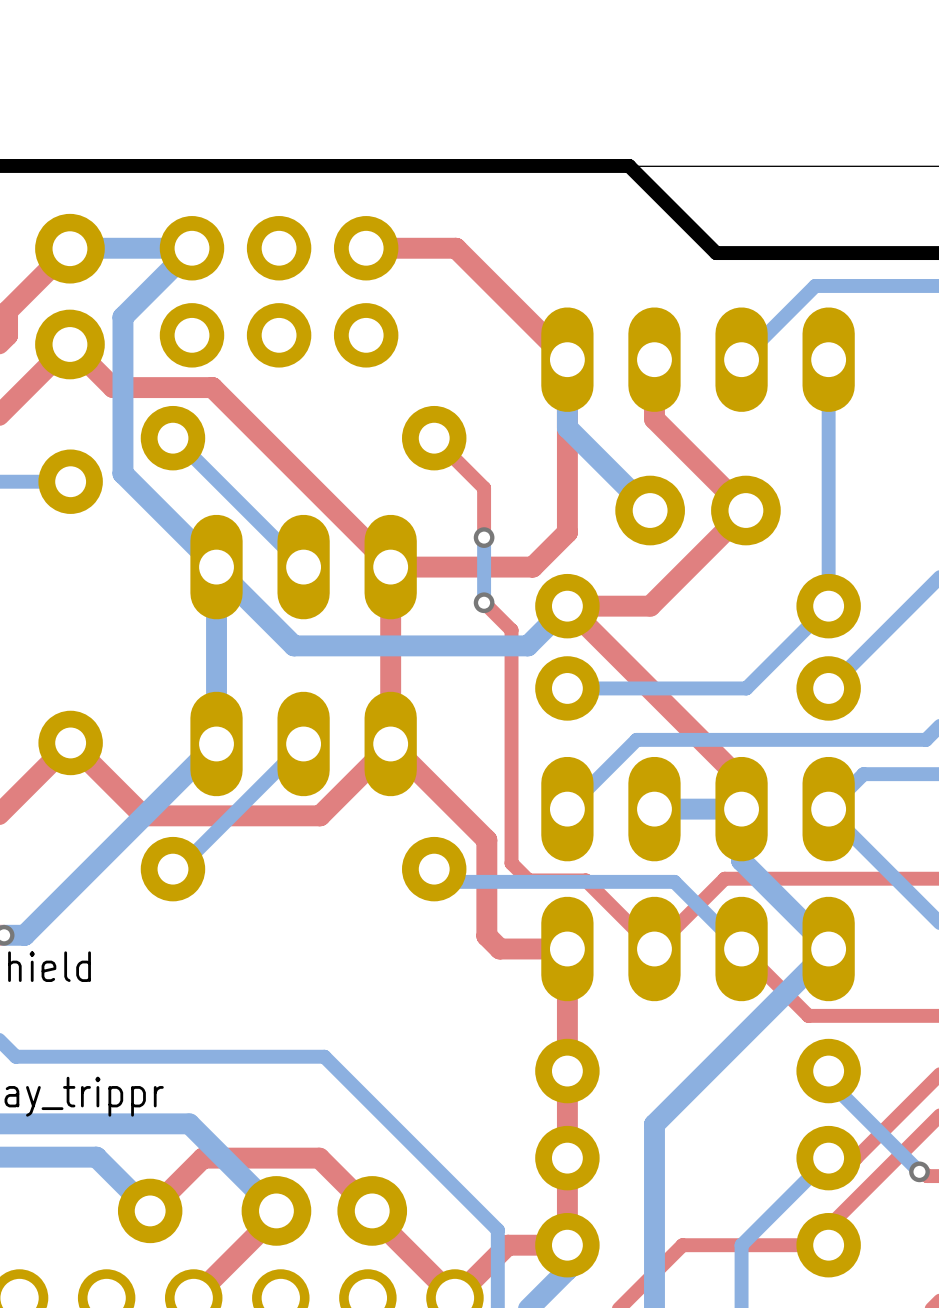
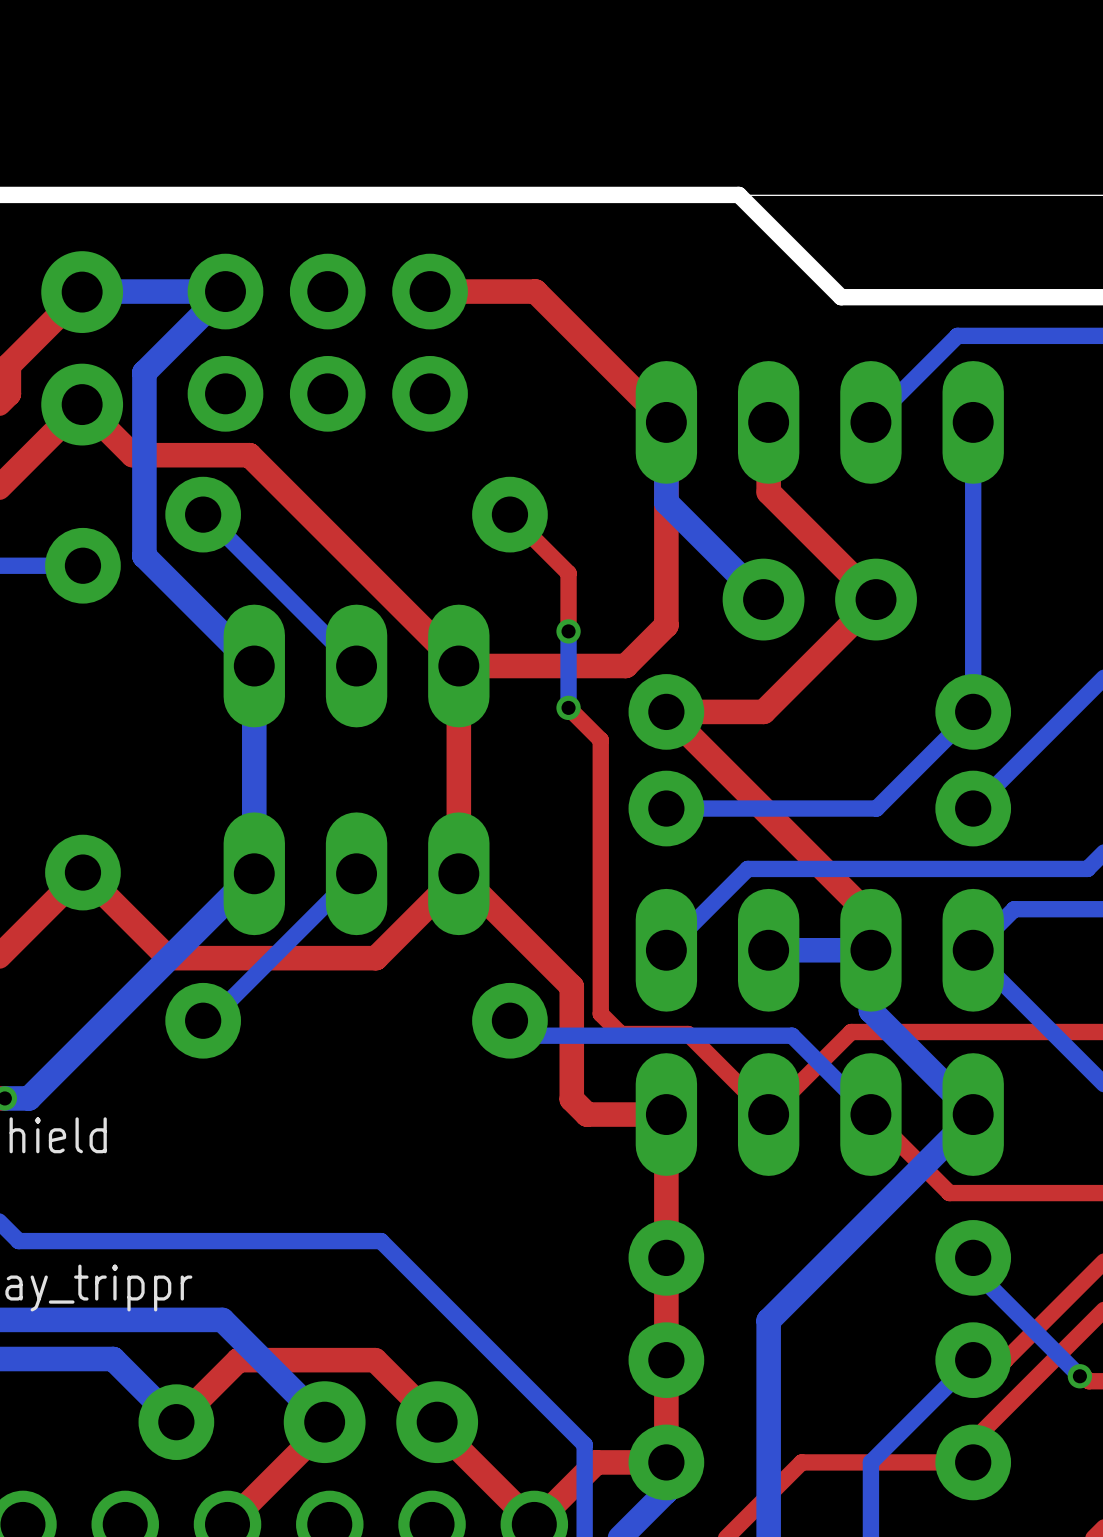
bottom track: (216, 568) (294, 645) (527, 645) (567, 606) -> none

